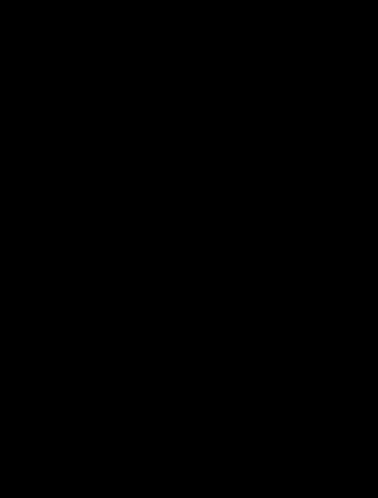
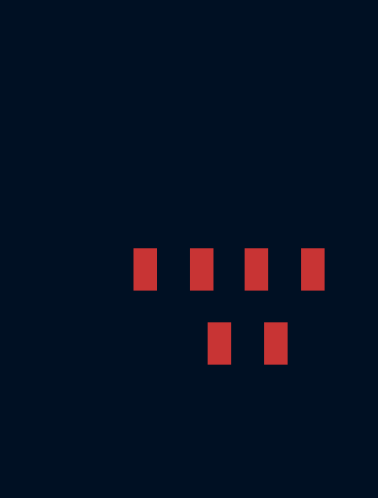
part: none -> (173, 269)
part: none -> (284, 269)
part: none -> (247, 343)

